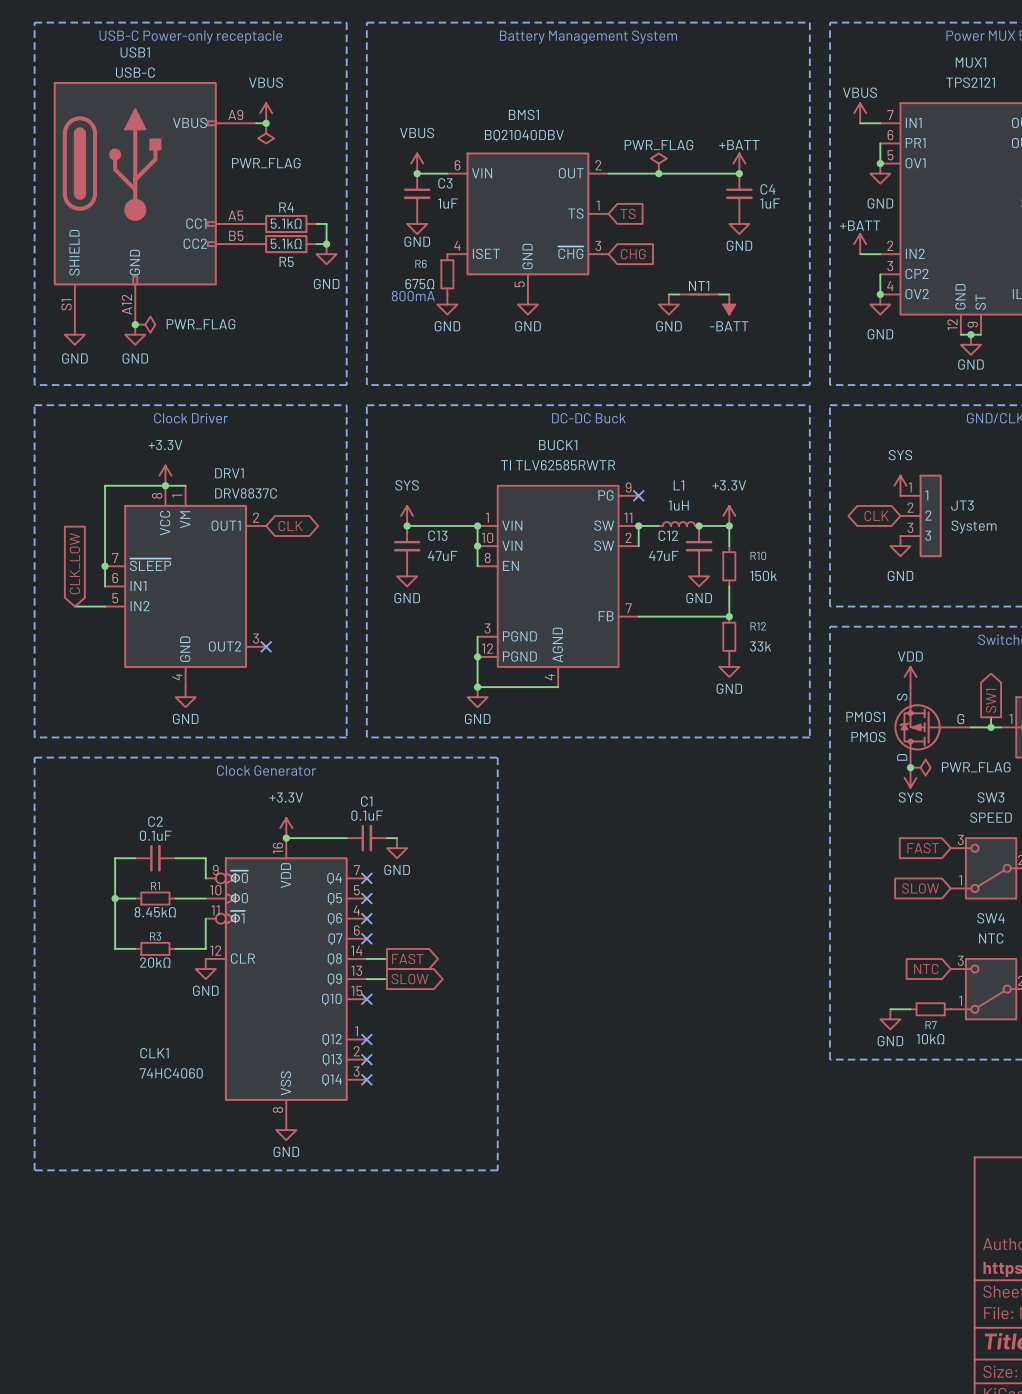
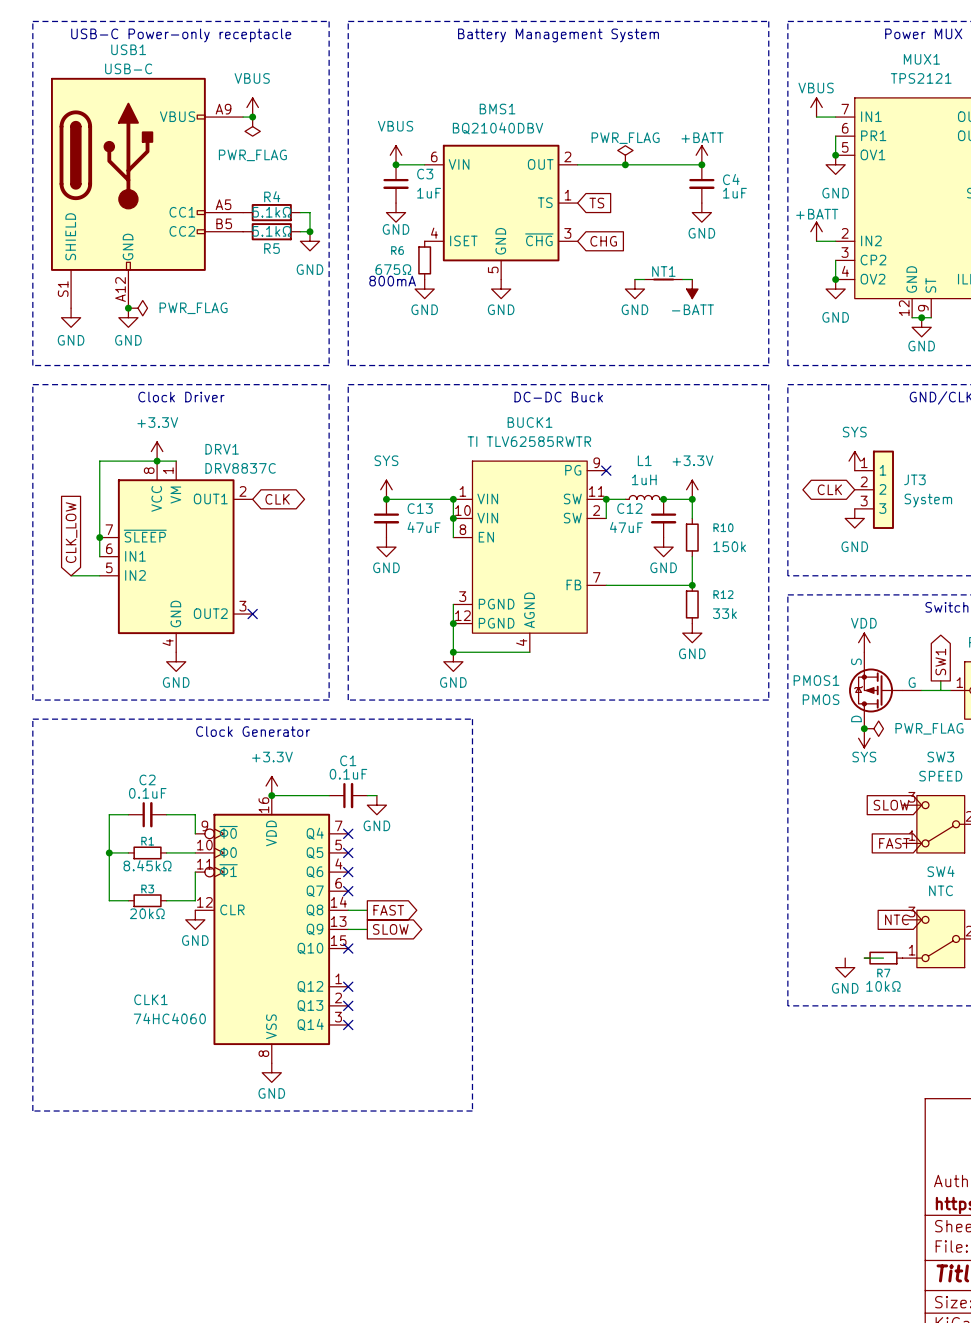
junction: (991, 727) -> none
global label position: FAST (923, 848) -> FAST (894, 843)
global label position: SLOW (920, 888) -> SLOW (891, 805)
global label position: NTC (926, 969) -> NTC (896, 919)
wire: (890, 1009) (910, 1009) -> (883, 958) (864, 958)

